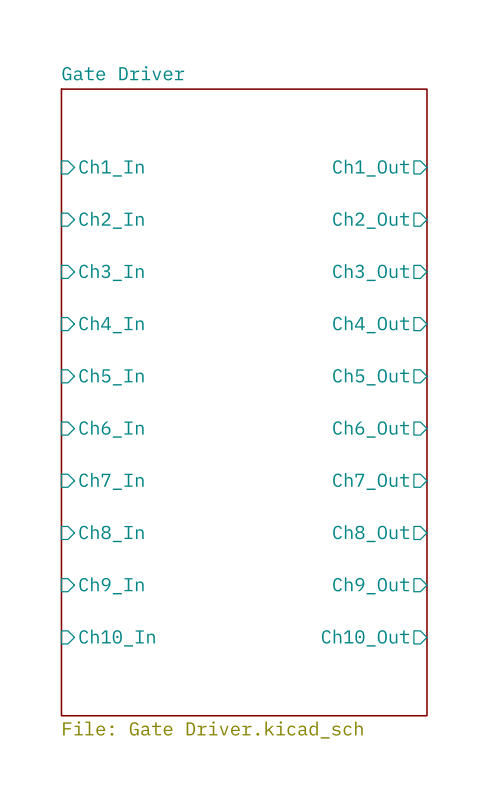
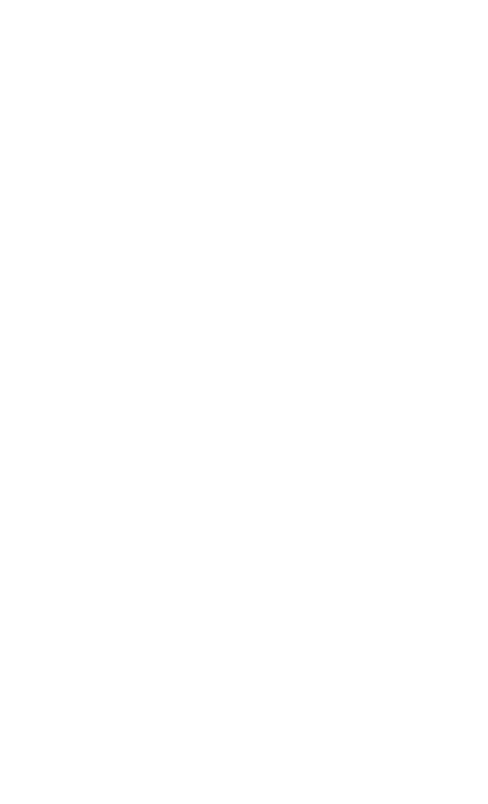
sheet pin: Ch1_In (111, 168) -> none
sheet pin: Ch1_Out (371, 168) -> none
sheet pin: Ch2_In (111, 220) -> none
sheet pin: Ch2_Out (371, 220) -> none
sheet pin: Ch3_In (111, 272) -> none
sheet pin: Ch3_Out (371, 272) -> none
sheet pin: Ch4_In (111, 324) -> none
sheet pin: Ch4_Out (371, 324) -> none
sheet pin: Ch5_In (111, 377) -> none
sheet pin: Ch5_Out (371, 377) -> none
sheet Gate Driver: File: Gate Driver.kicad_sch (244, 402) -> none
sheet pin: Ch6_In (111, 429) -> none
sheet pin: Ch6_Out (371, 429) -> none
sheet pin: Ch7_In (111, 481) -> none
sheet pin: Ch7_Out (371, 481) -> none
sheet pin: Ch8_In (111, 533) -> none
sheet pin: Ch8_Out (371, 533) -> none
sheet pin: Ch9_In (111, 585) -> none
sheet pin: Ch9_Out (371, 585) -> none
sheet pin: Ch10_In (117, 638) -> none
sheet pin: Ch10_Out (365, 638) -> none

